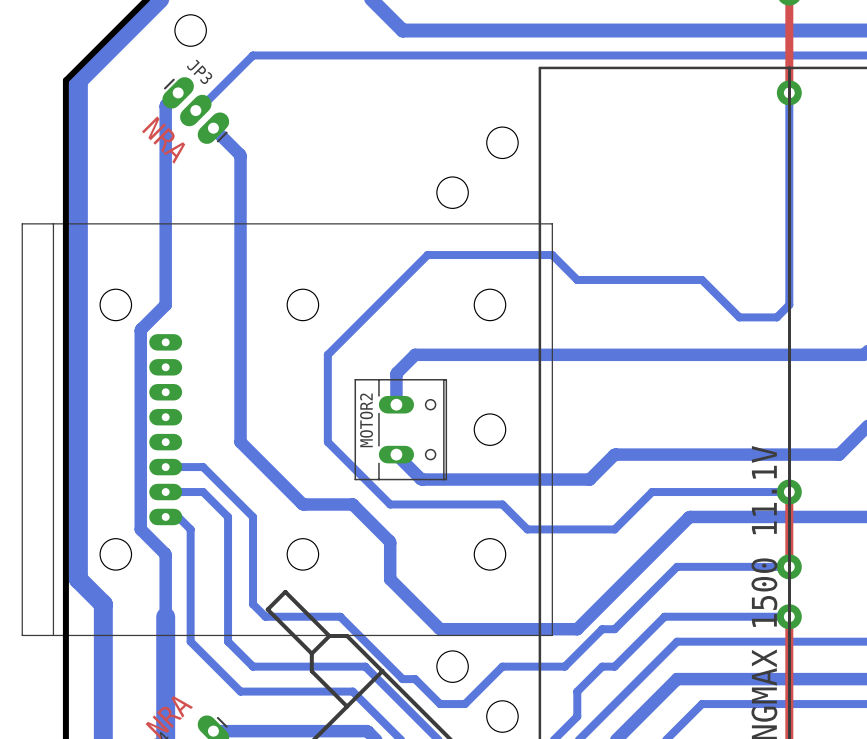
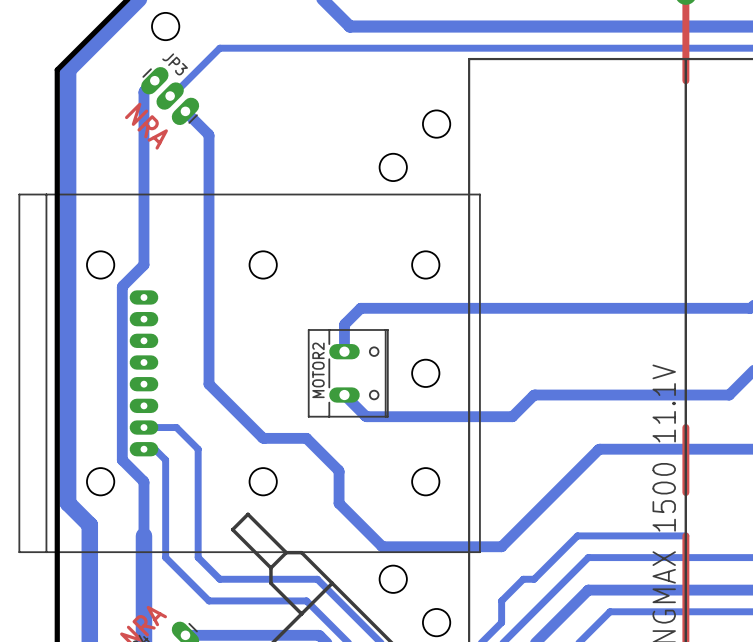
bottom track: (789, 92) (789, 304) (776, 317) (739, 317) (702, 279) (577, 279) (552, 255) (427, 255) (327, 354) (327, 442) (390, 504) (502, 504) (527, 529) (614, 529) (652, 492) (789, 492) -> none
via: (789, 92) -> none
bottom track: (165, 467) (203, 467) (253, 516) (253, 604) (265, 616) (340, 616) (402, 679) (415, 679) (440, 704) (465, 704) (502, 666) (564, 666) (602, 629) (614, 629) (677, 566) (789, 566) -> none
via: (789, 492) -> none
via: (789, 566) -> none
via: (789, 616) -> none

